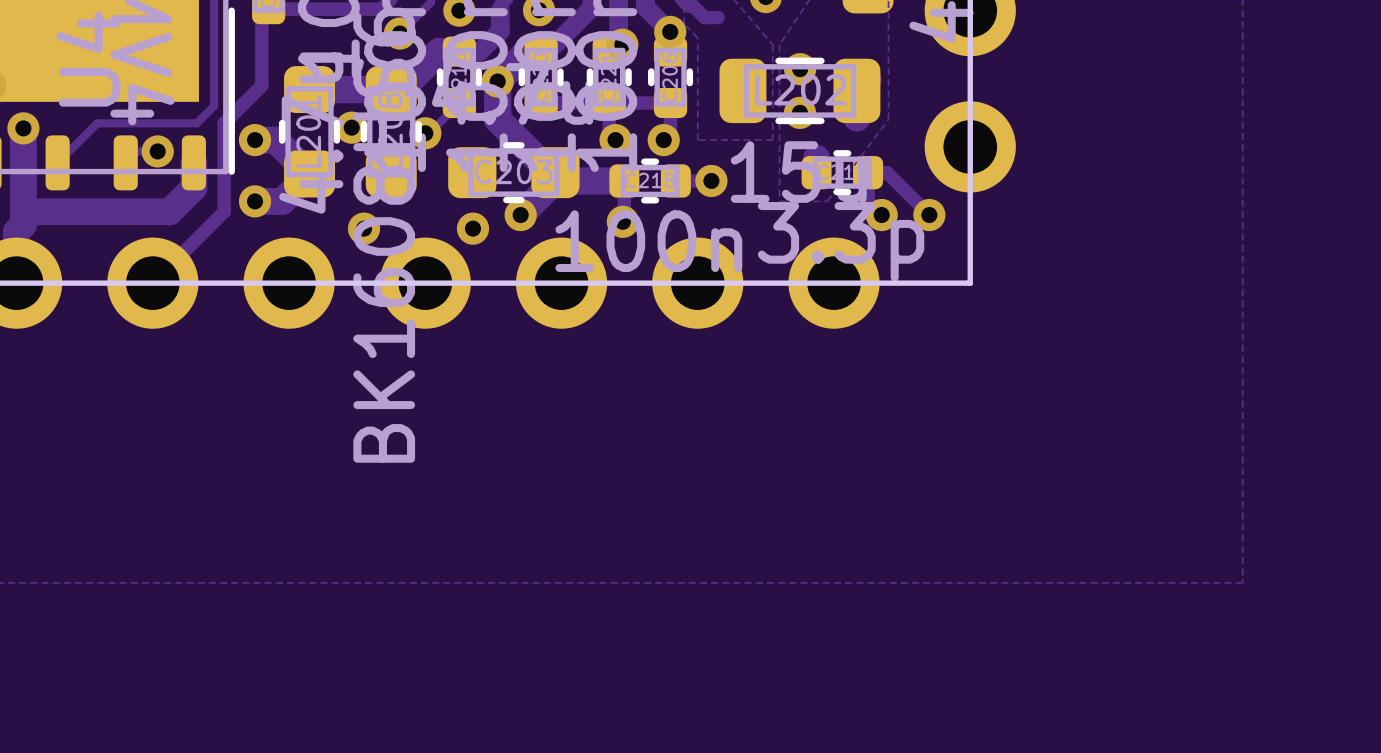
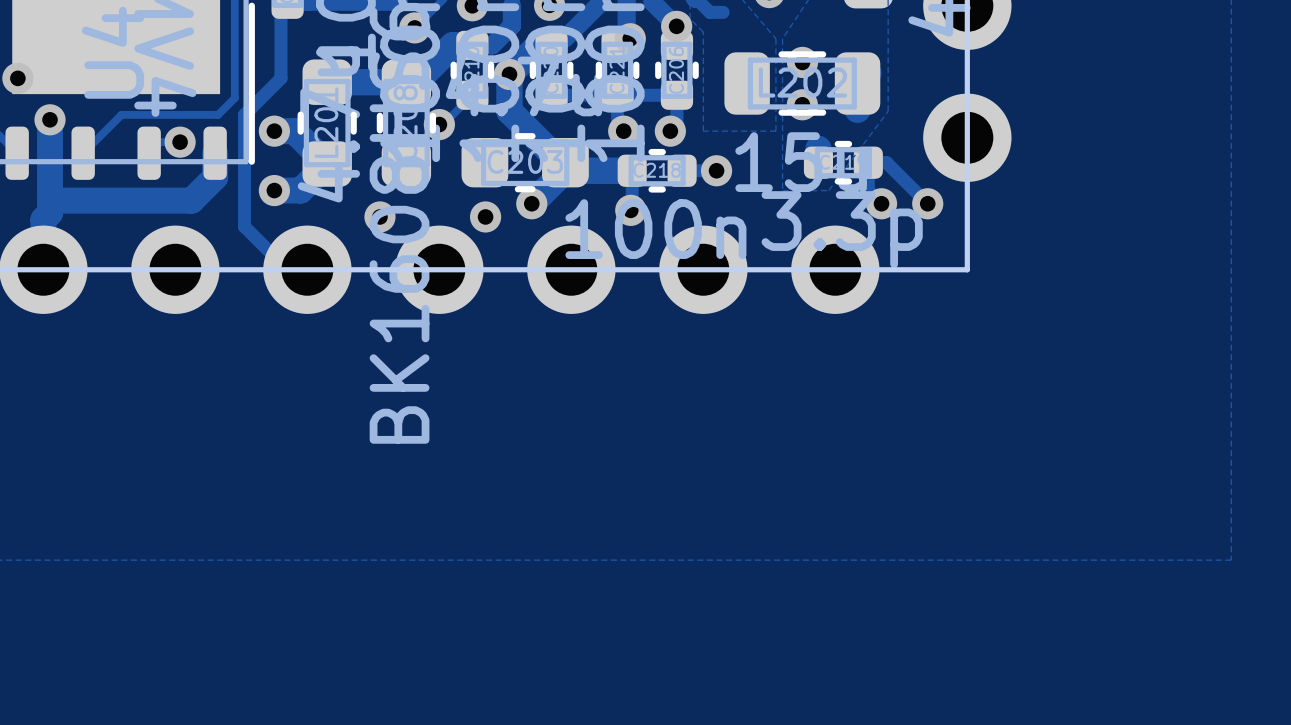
via: (351, 127) -> none
track: (224, 211) (152, 283) -> (244, 200) (244, 226) (273, 255)

